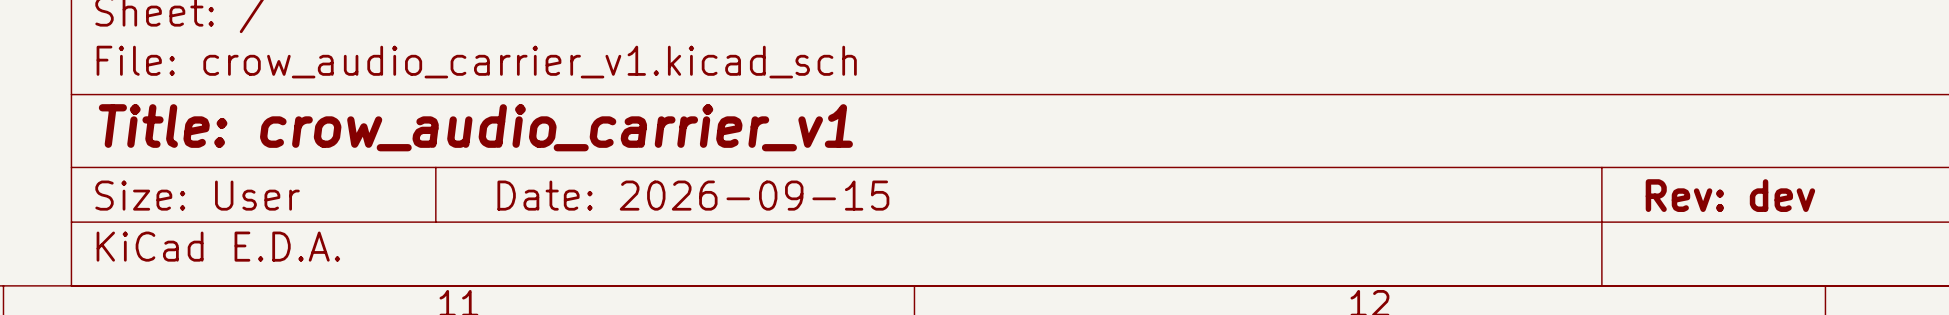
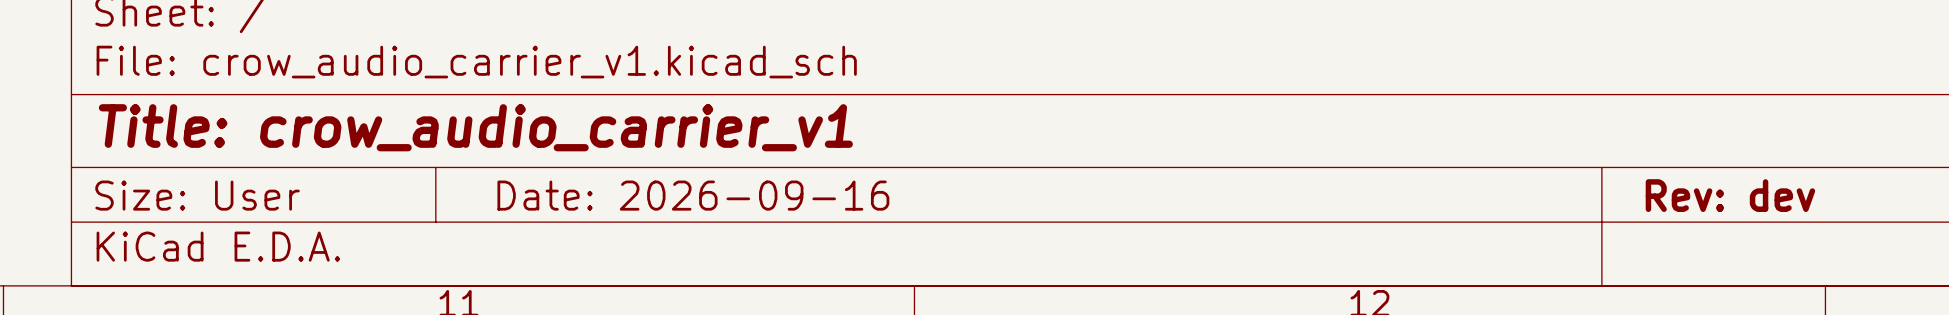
title block: Date: 2026-09-15 (693, 195) -> Date: 2026-09-16 (693, 195)

